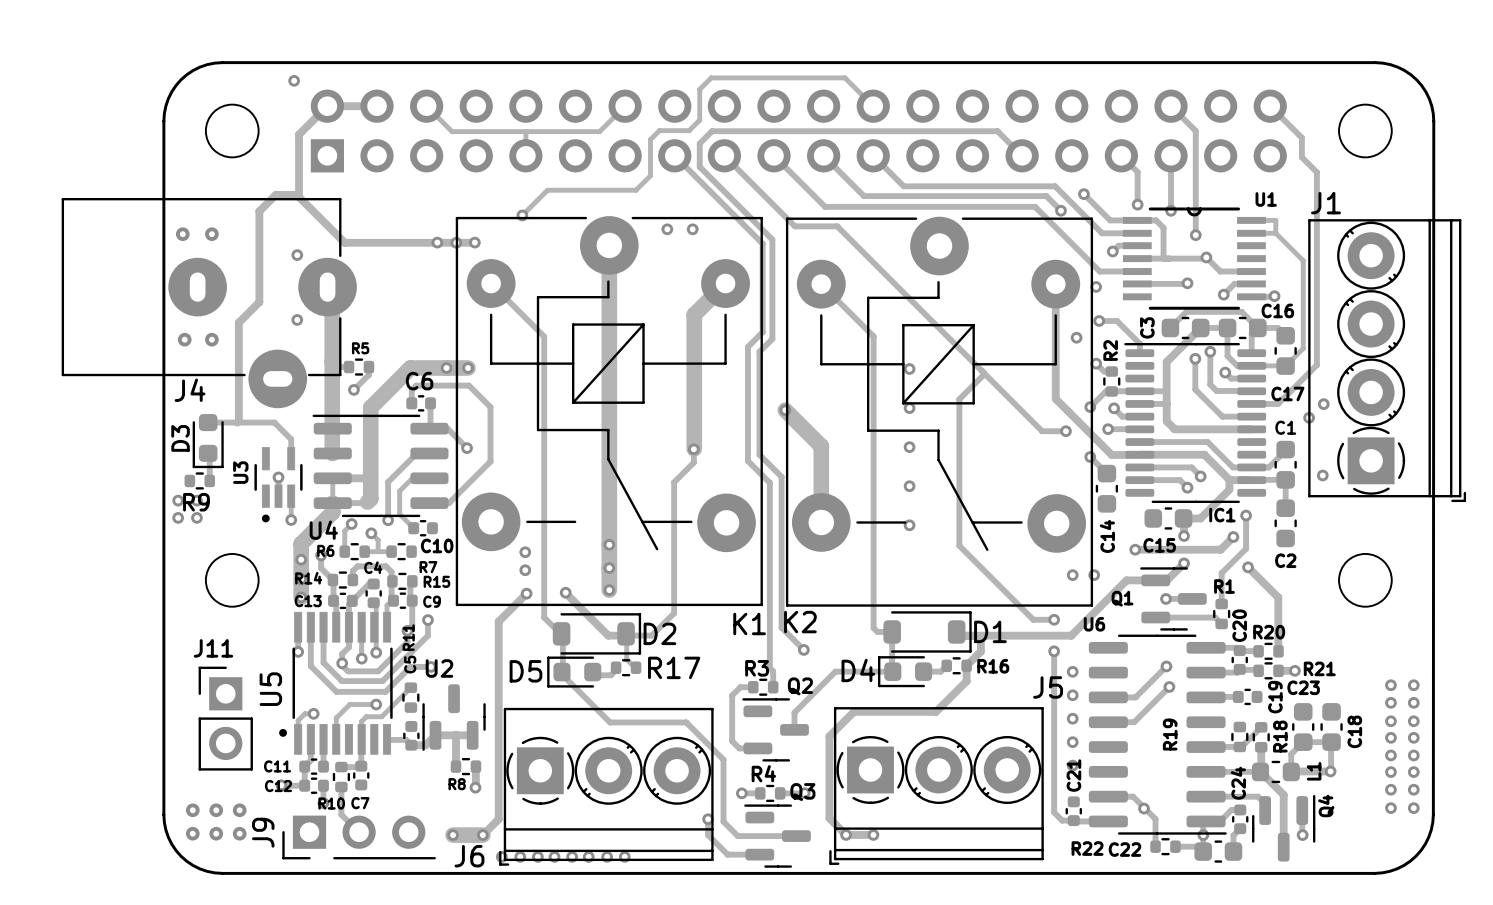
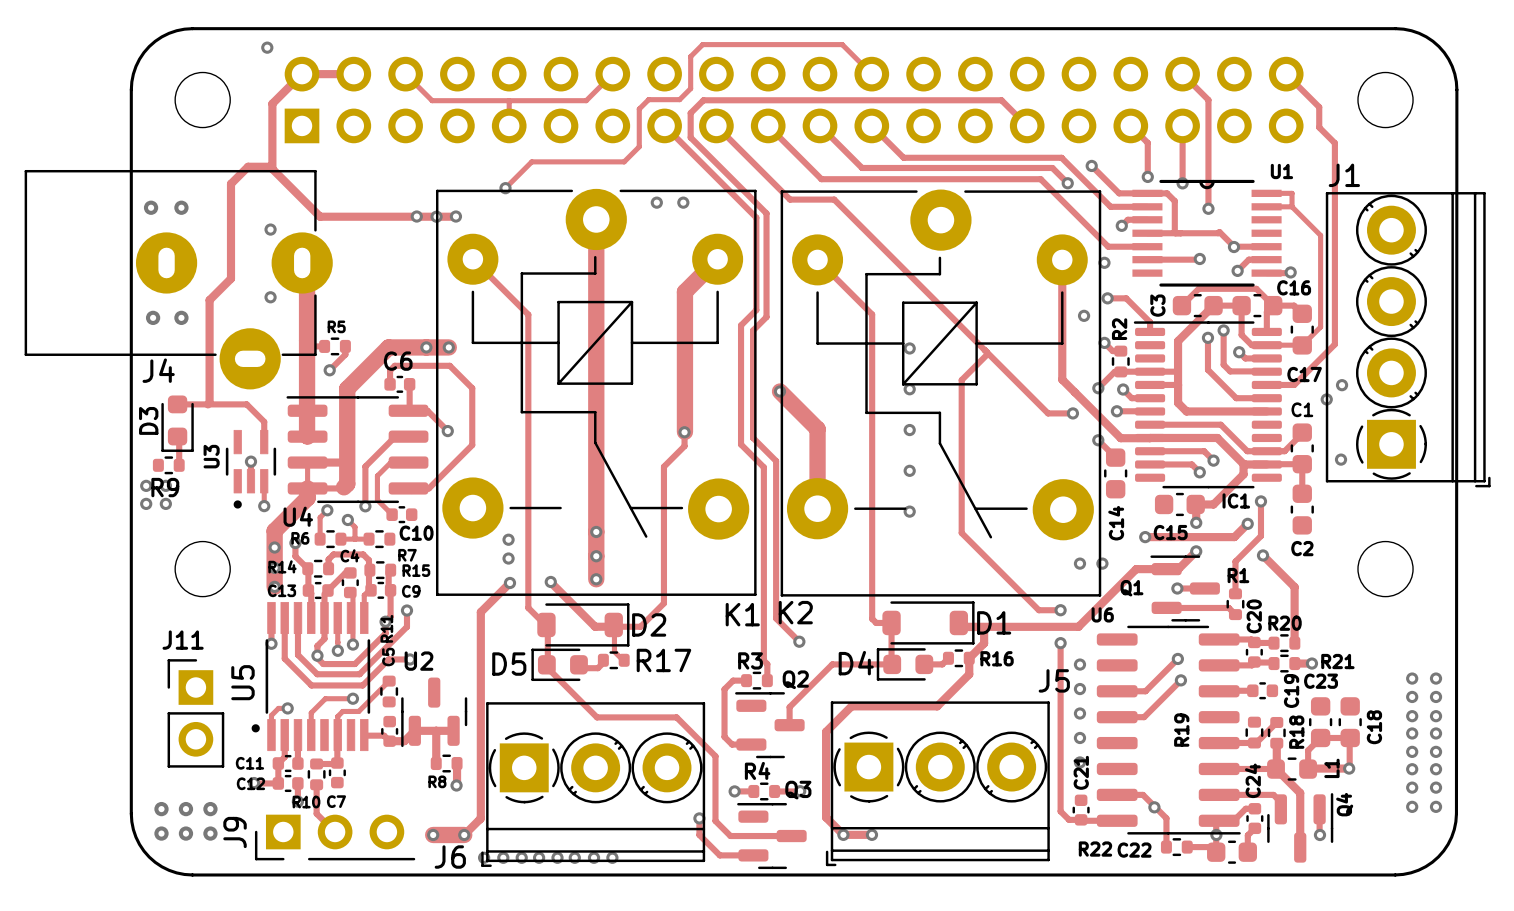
via position: (1206, 257) -> (1234, 247)

